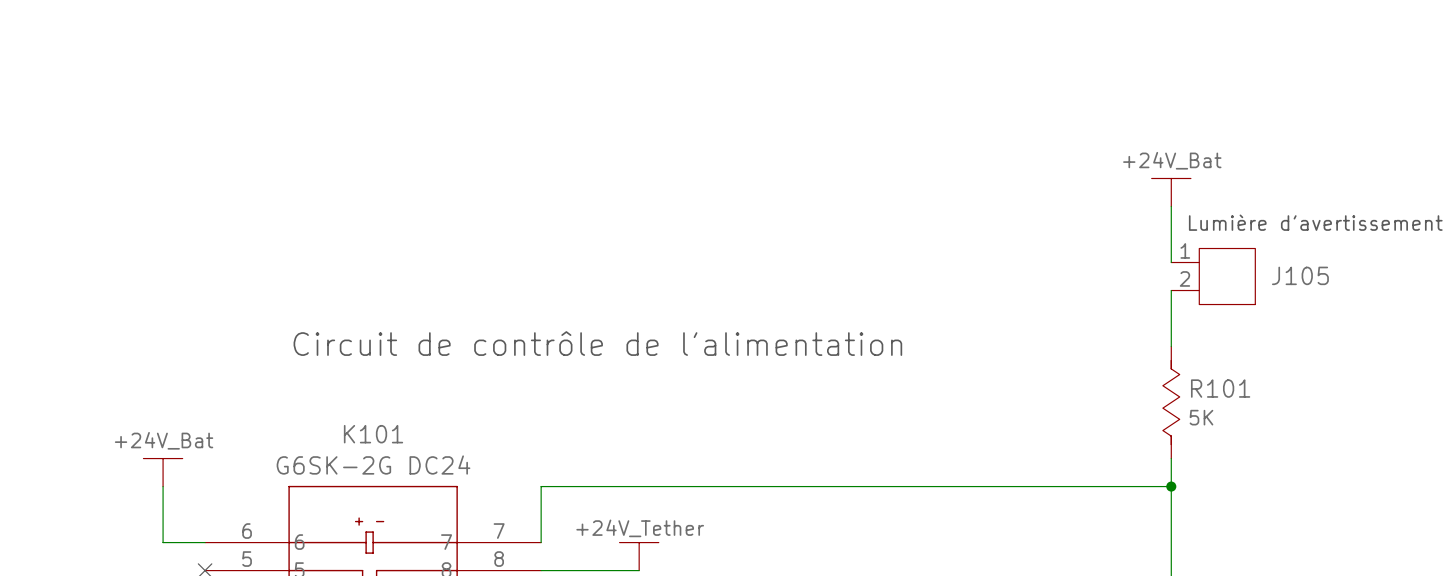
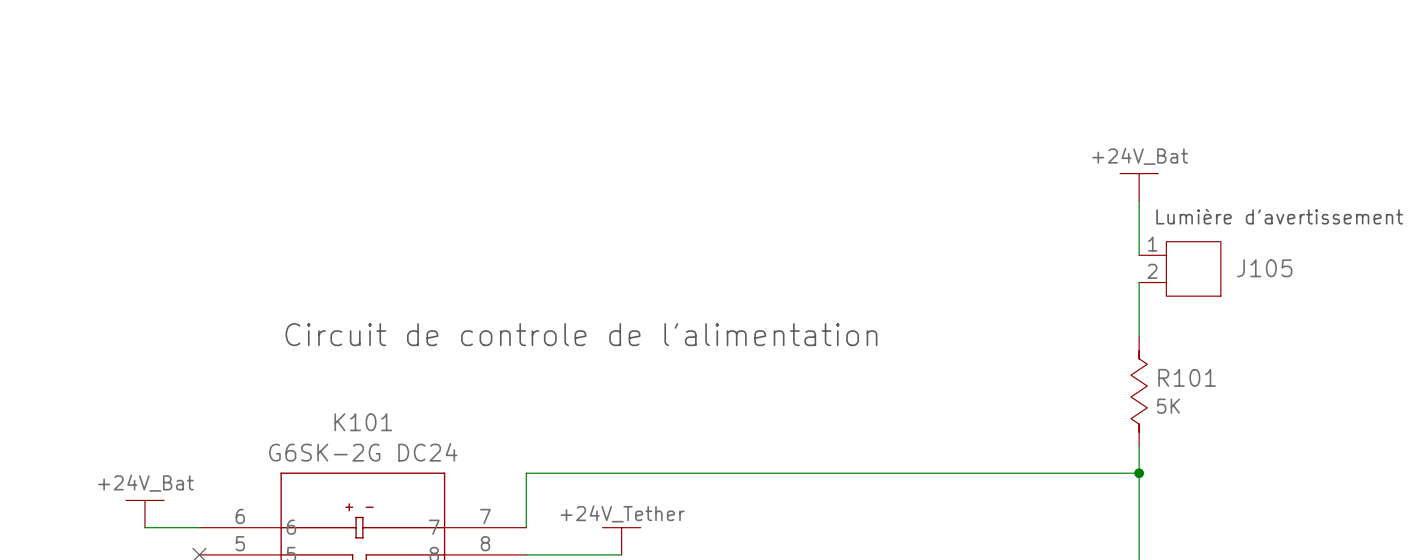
text: Circuit de contrôle de l'alimentation (597, 343) -> Circuit de controle de l'alimentation (581, 334)
power symbol position: +24V_Bat (163, 472) -> +24V_Bat (144, 514)
wire: (163, 486) (163, 542) -> (144, 527) (158, 527)

